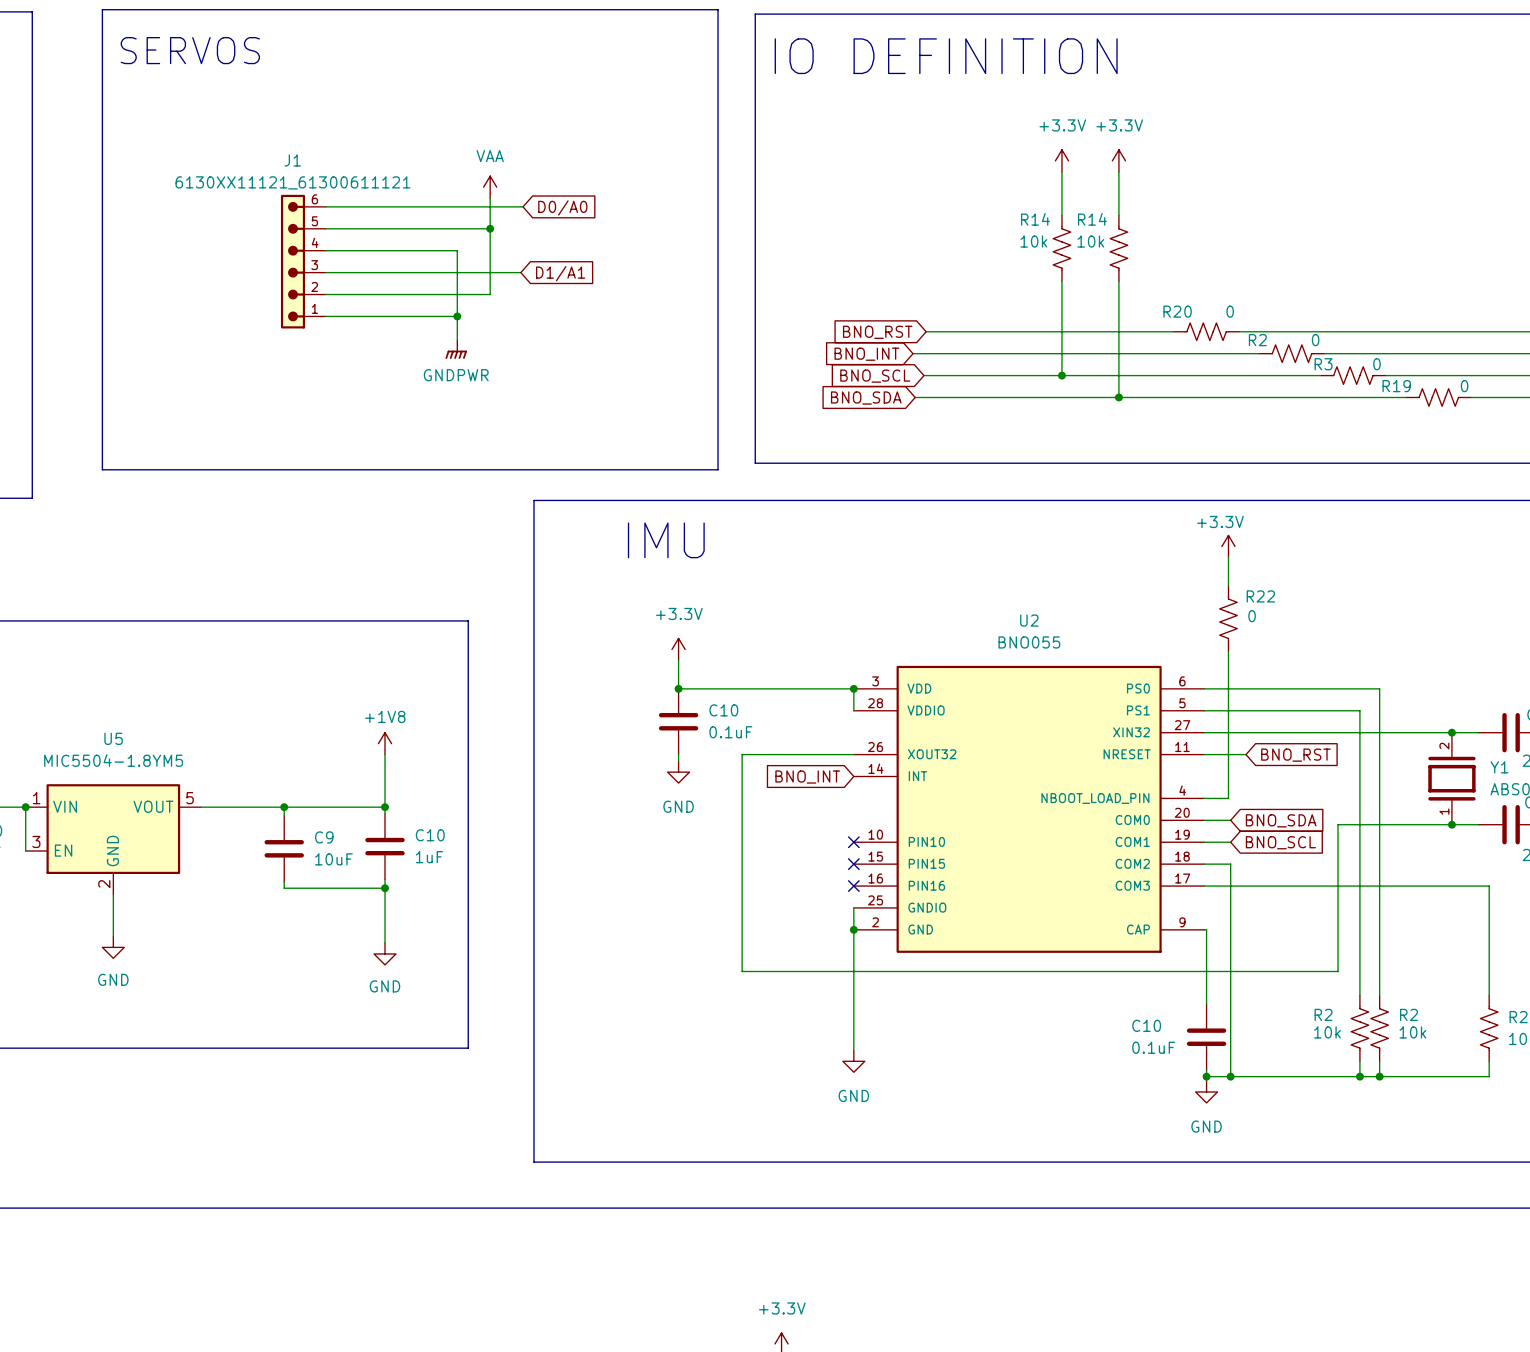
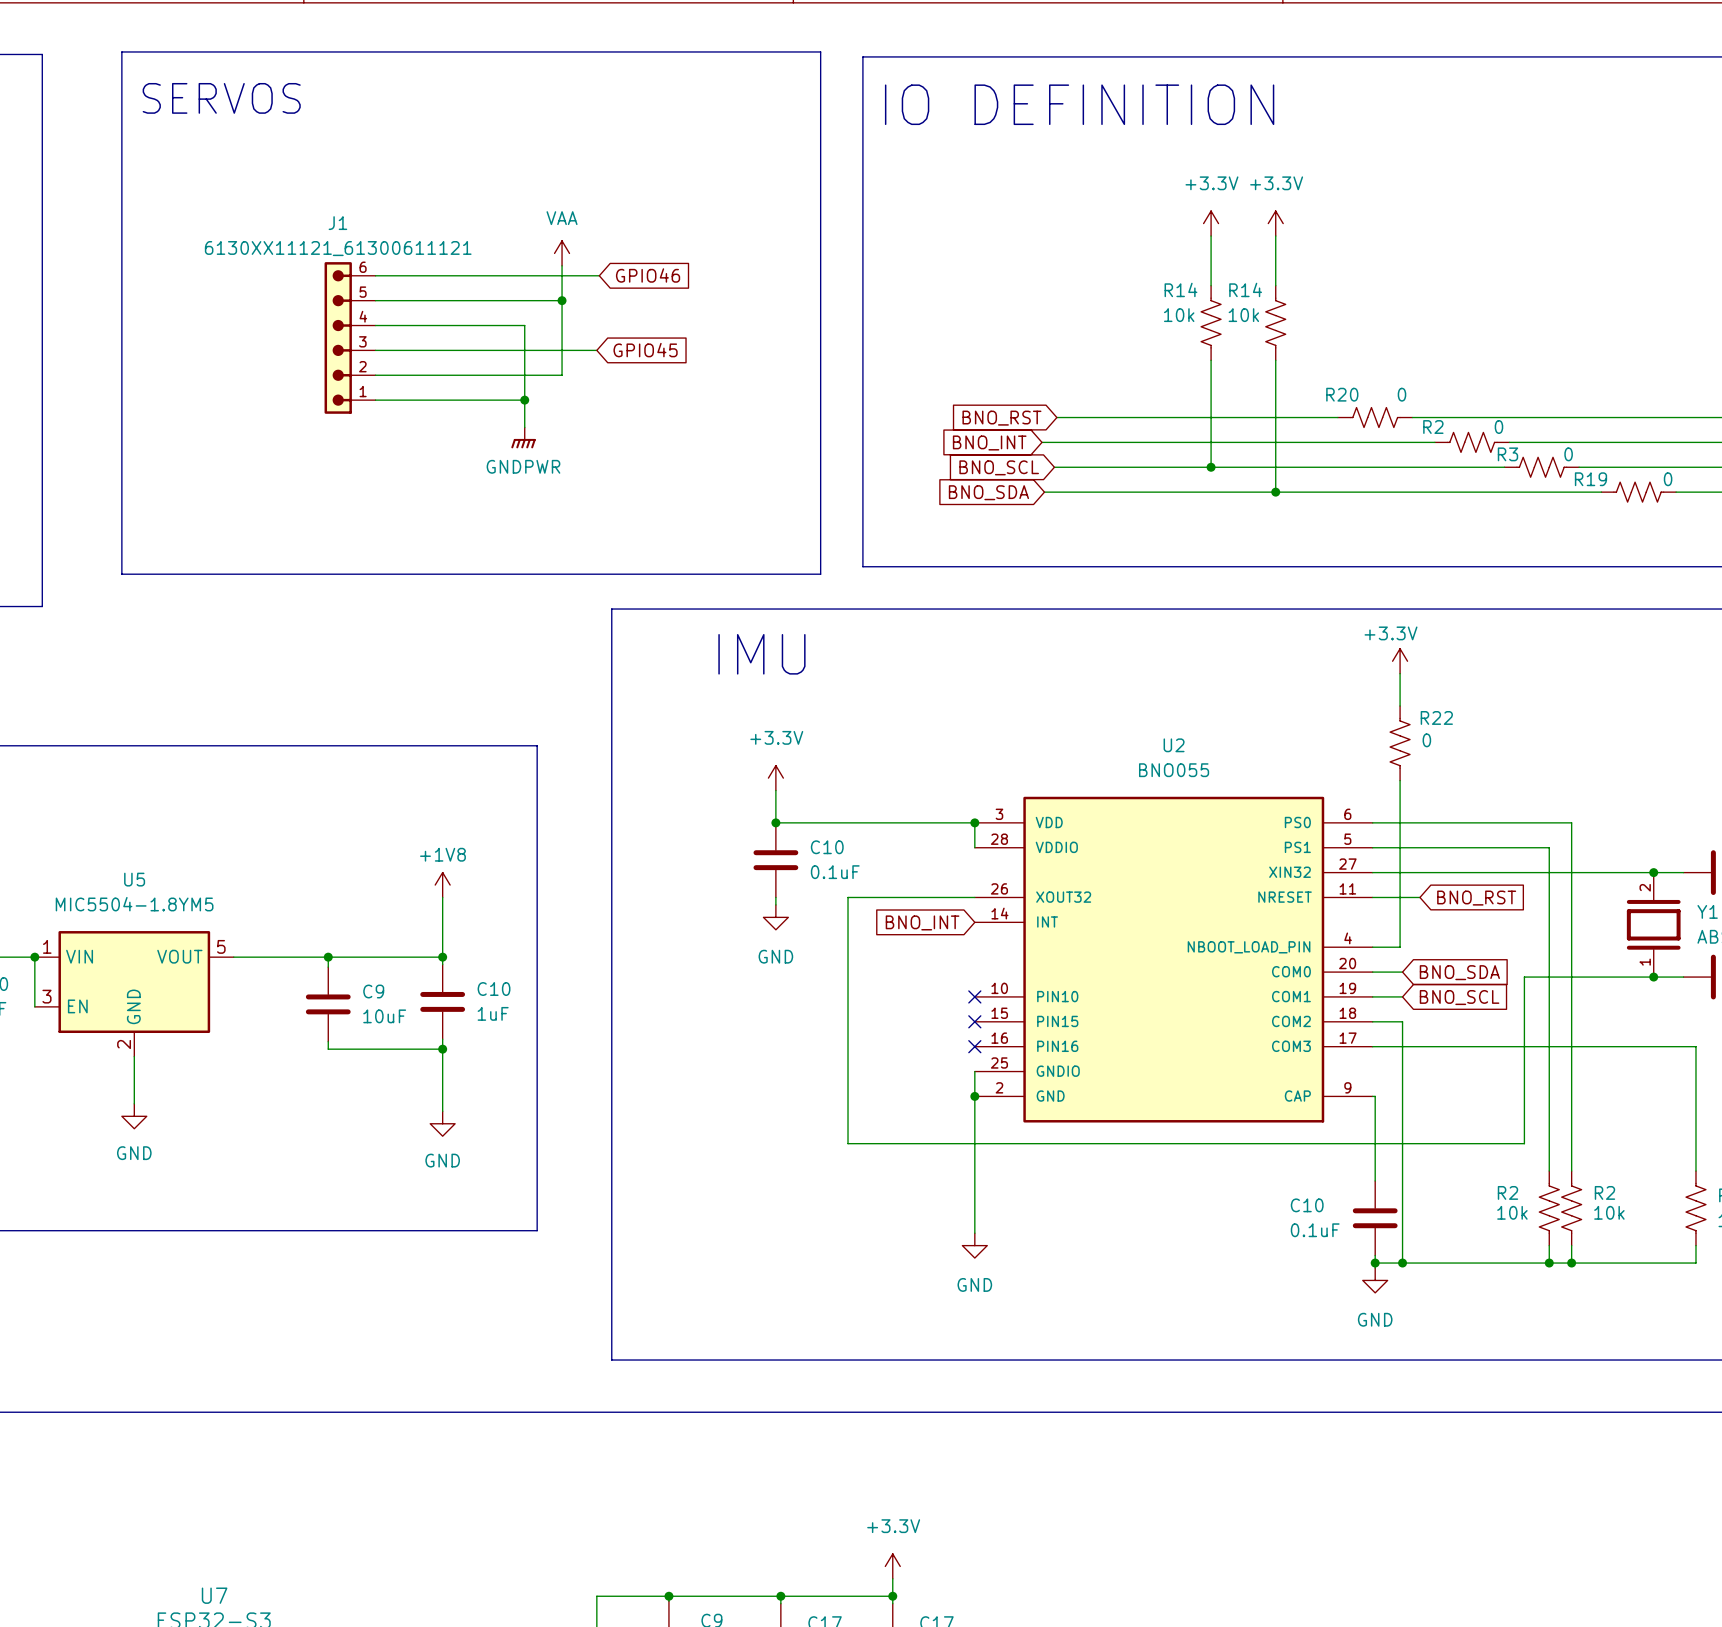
global label: D0/A0 (562, 207) -> GPIO46 (648, 275)
global label: D1/A1 (560, 273) -> GPIO45 (645, 350)

